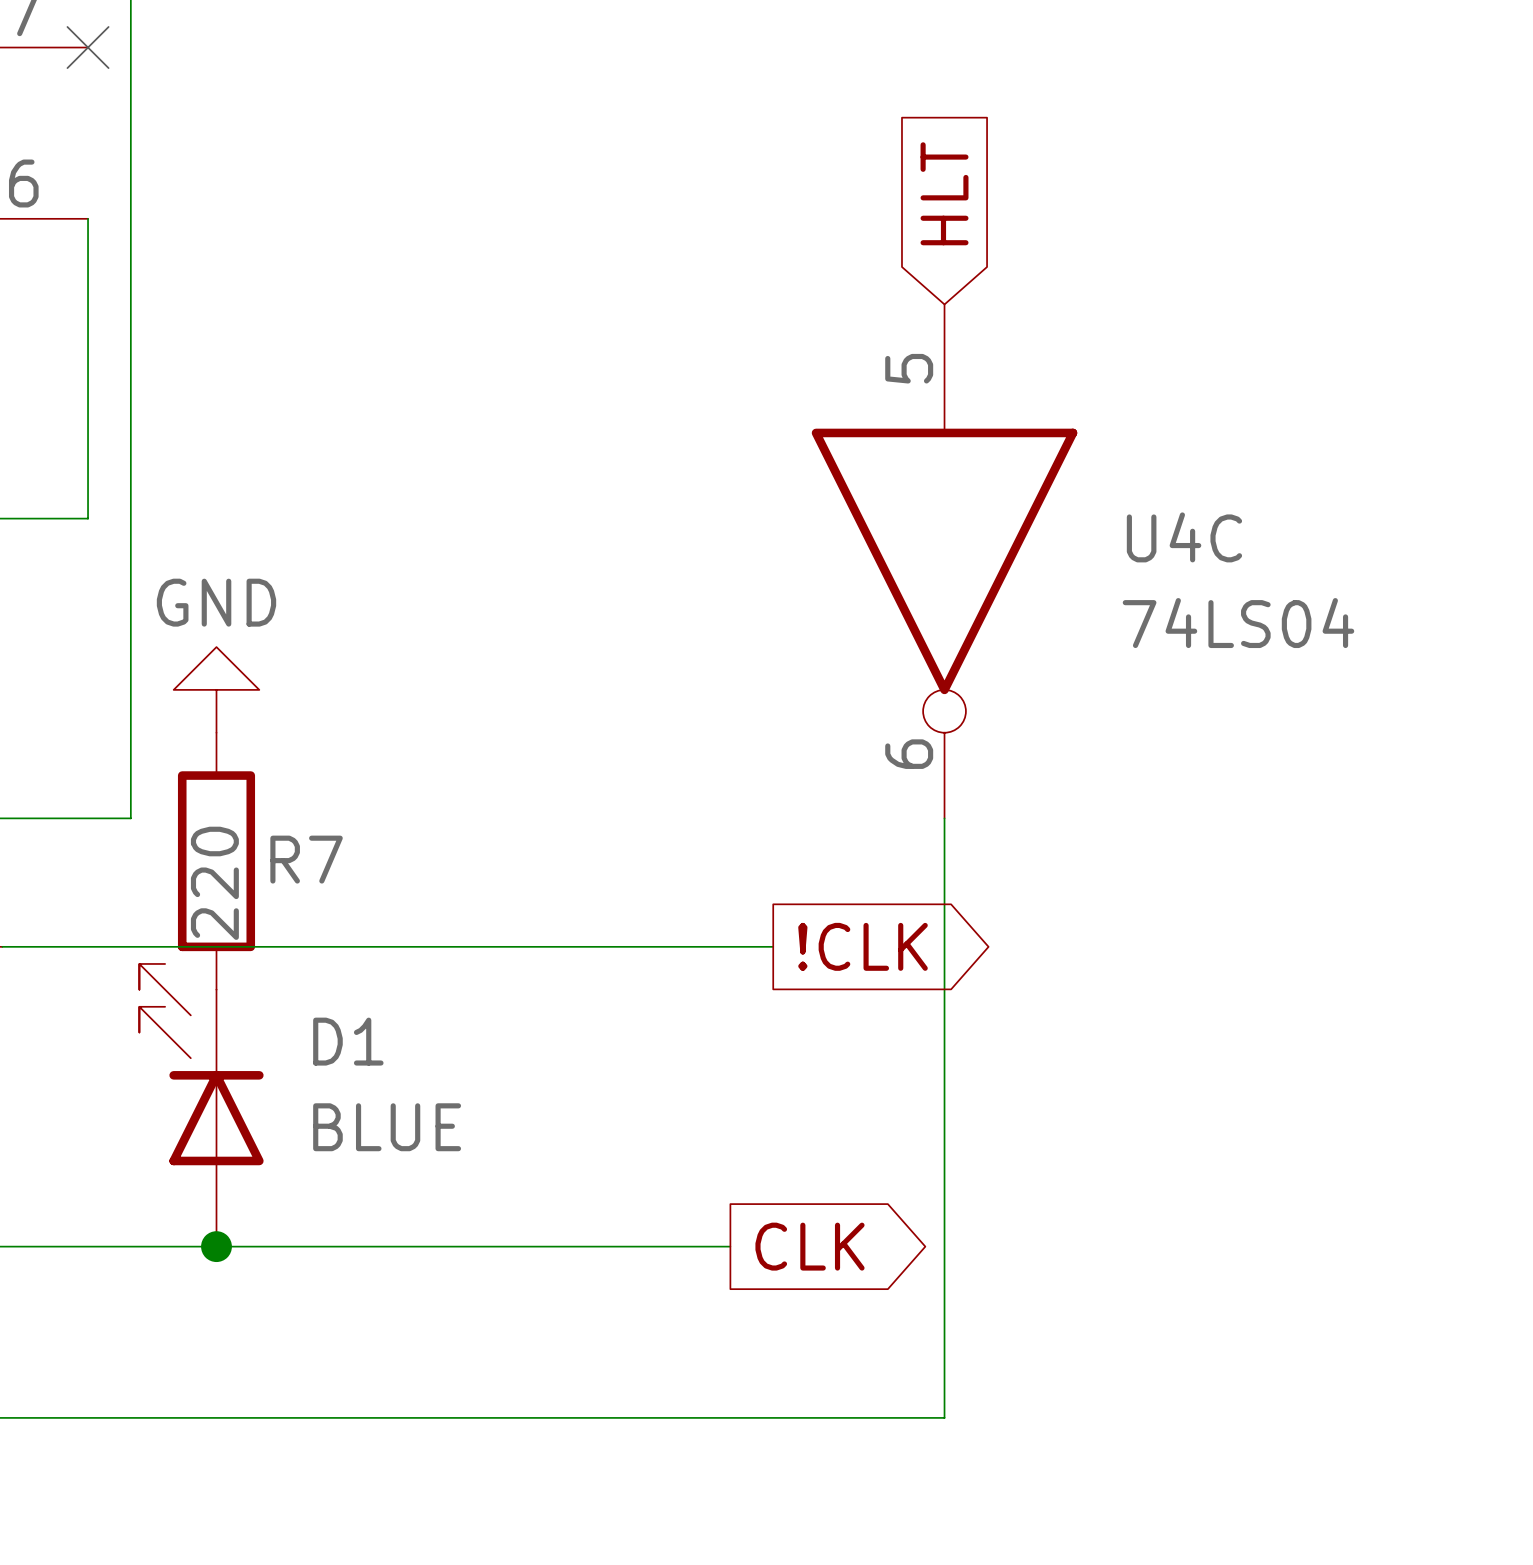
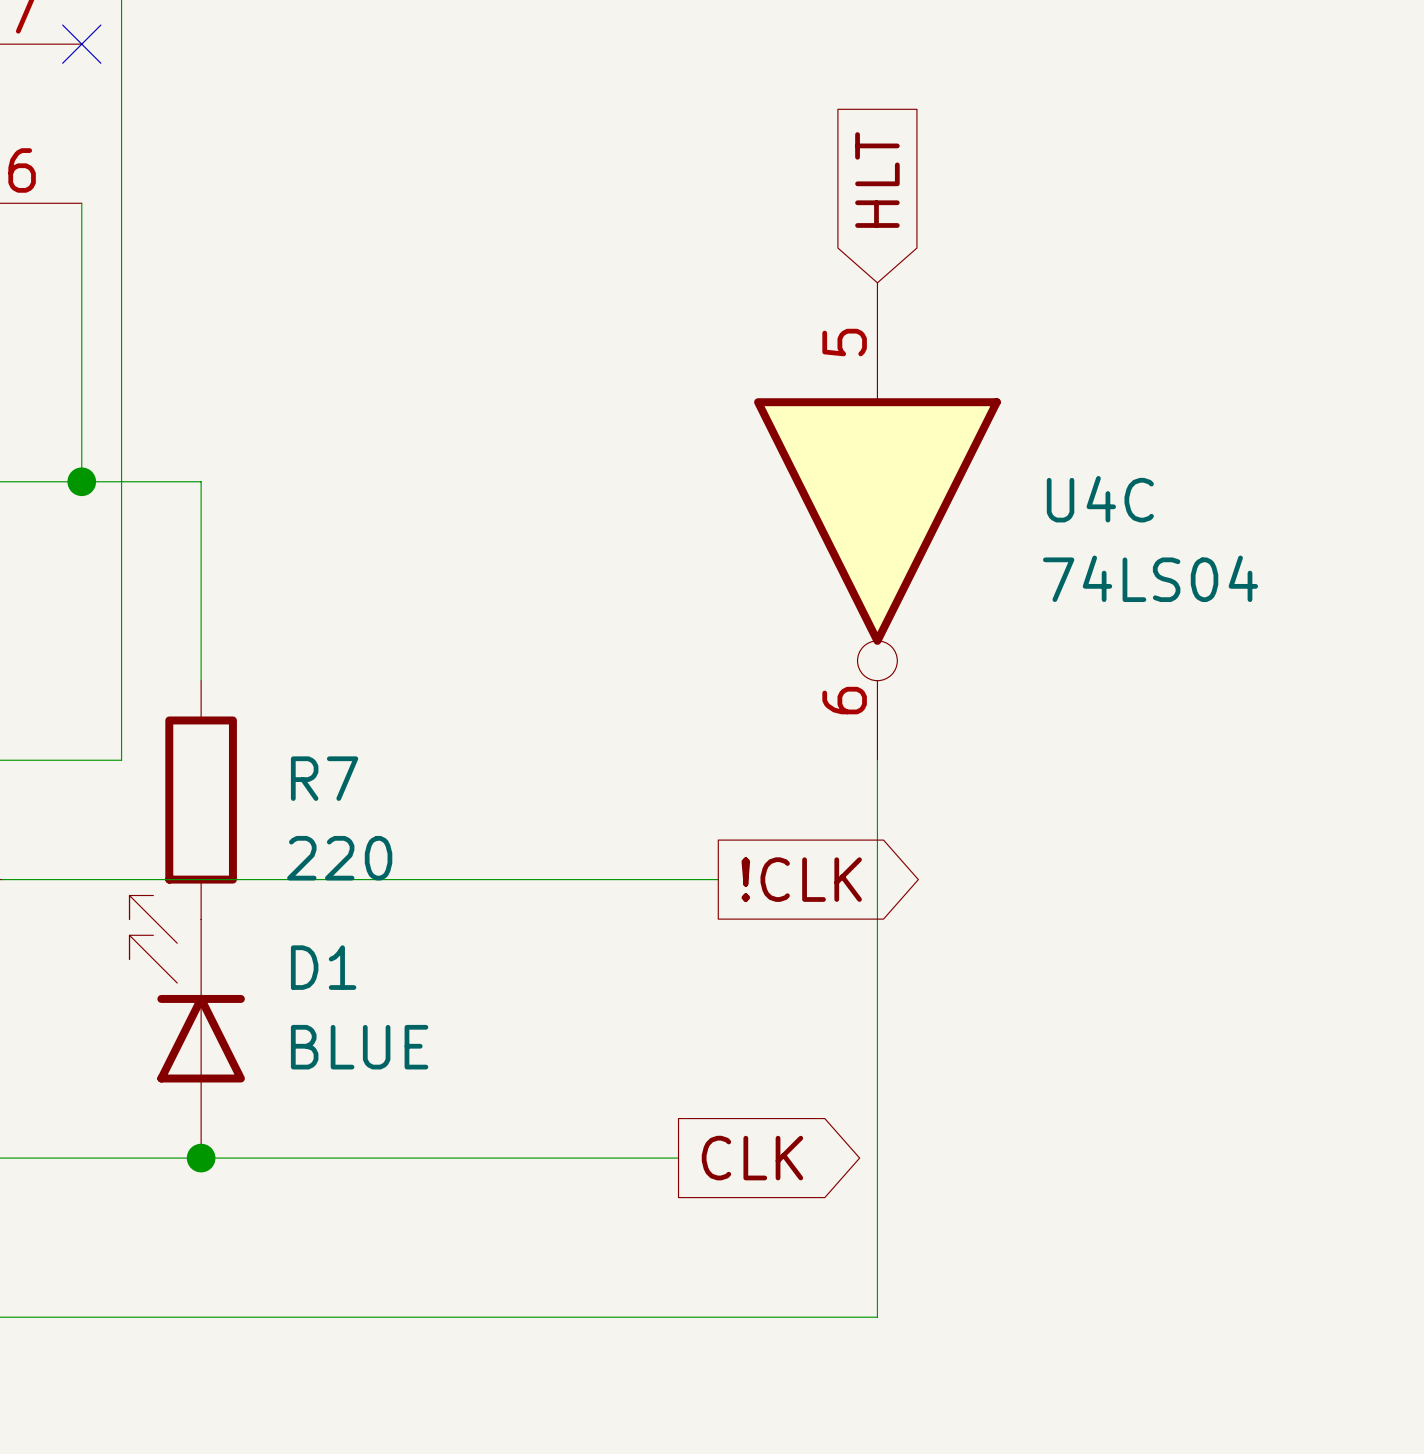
wire: none -> (81, 481) (201, 481) (201, 680)
junction: none -> (81, 481)
power symbol: GND (216, 689) -> none
R7 name position: R7 (306, 859) -> R7 (324, 778)
R7 value rotation: 0° (214, 883) -> 90° clockwise (339, 858)
R7 value position: 220 (214, 883) -> 220 (339, 858)

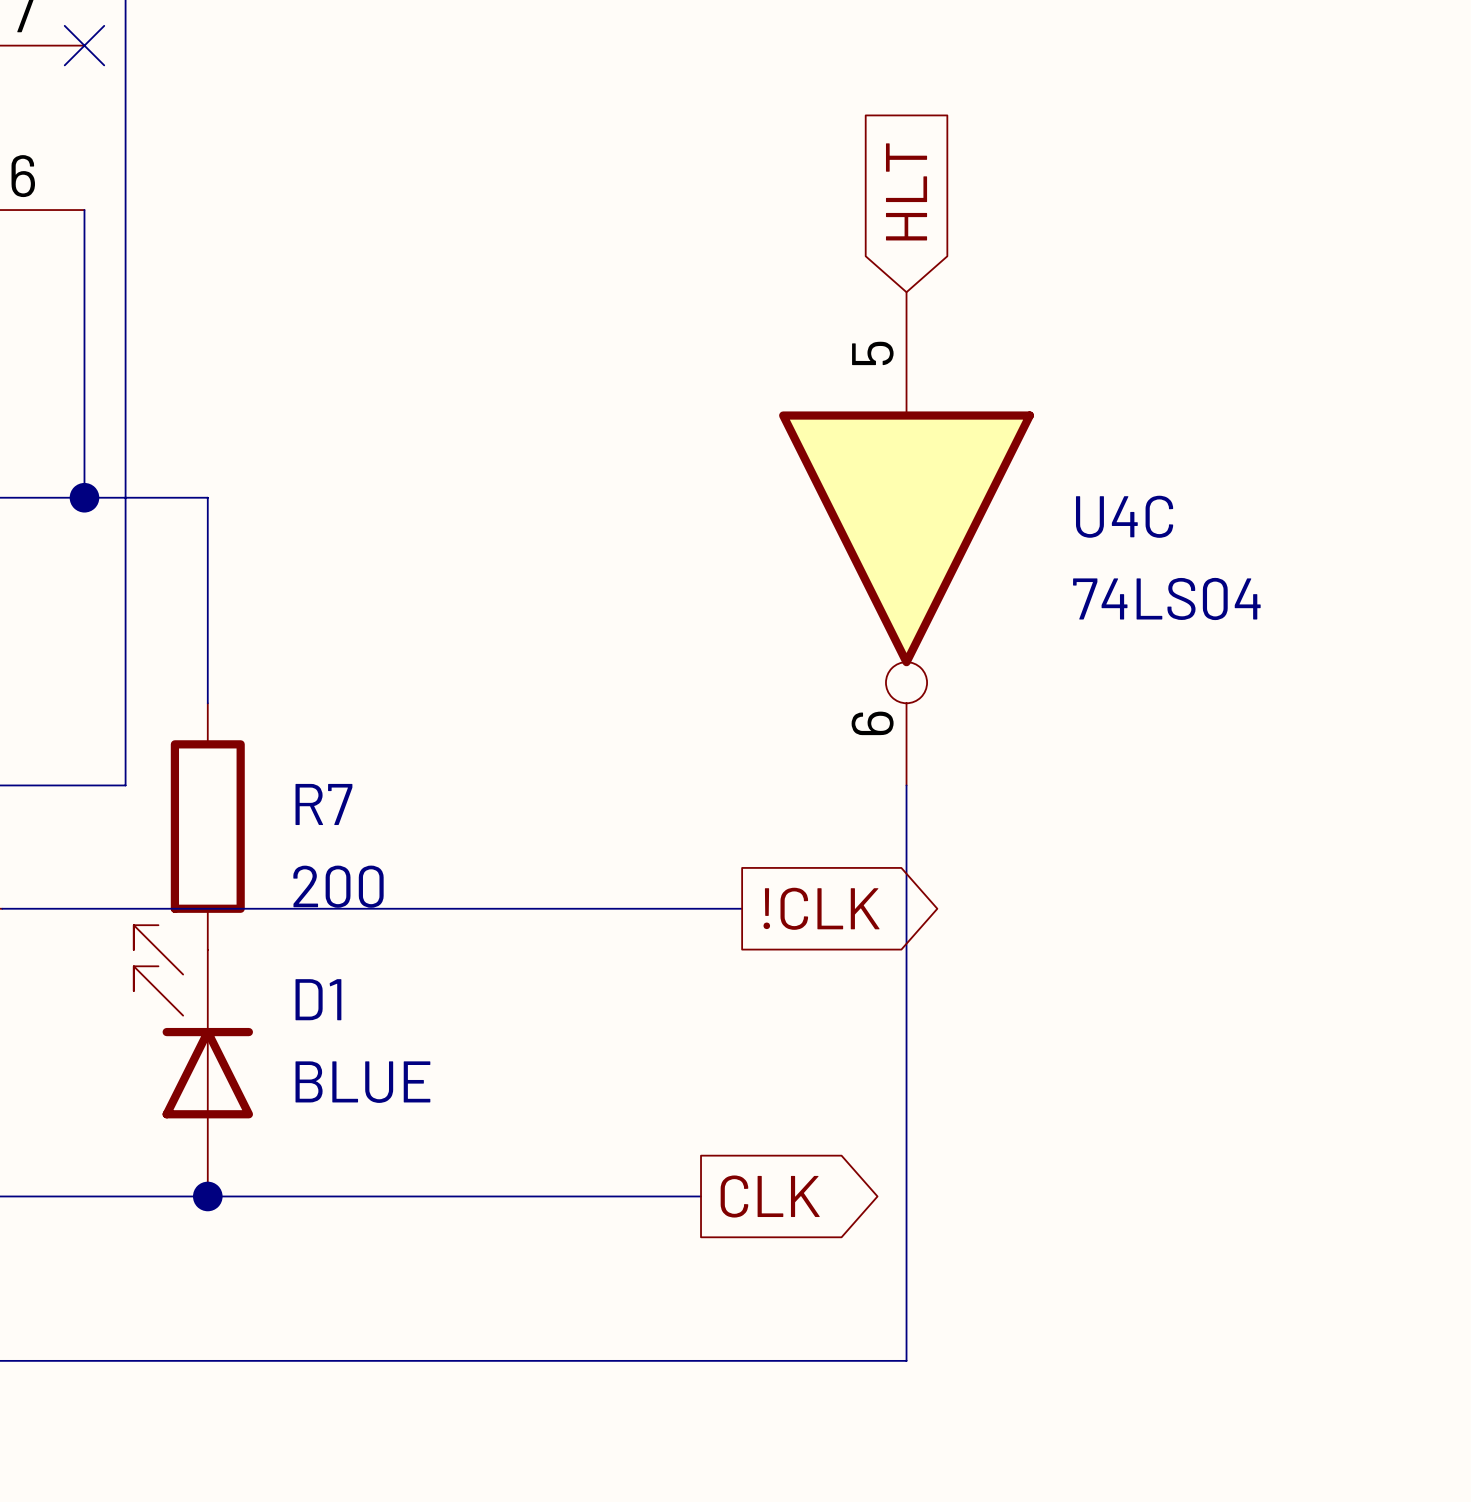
R7 value: 220 (339, 858) -> 200 (338, 886)

